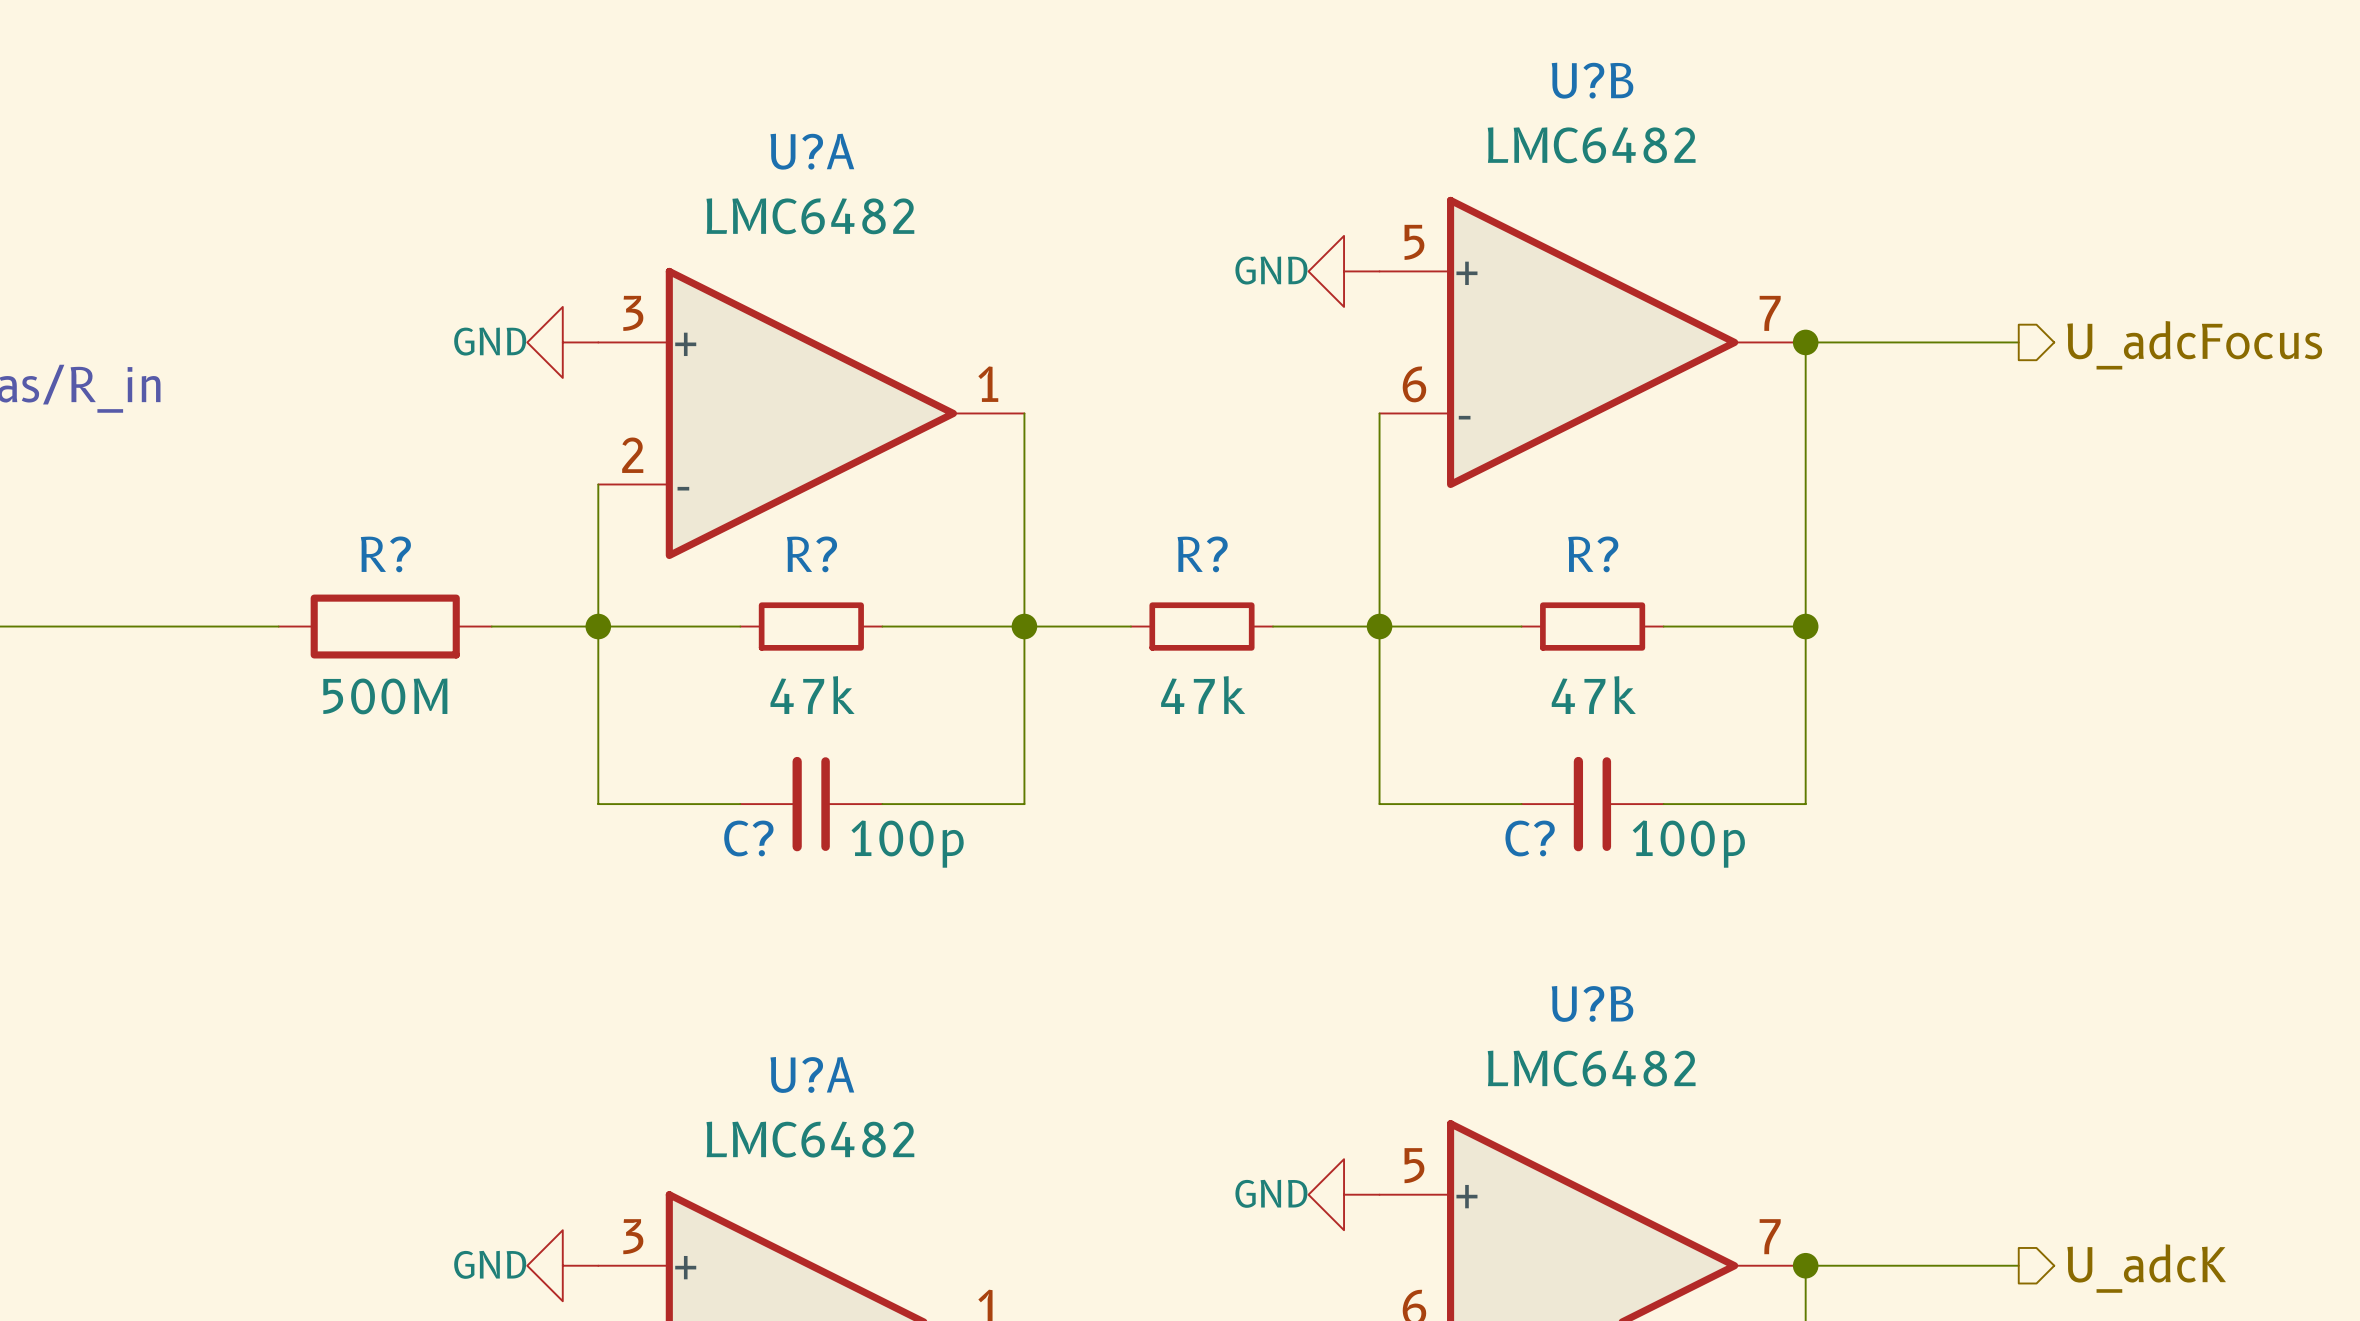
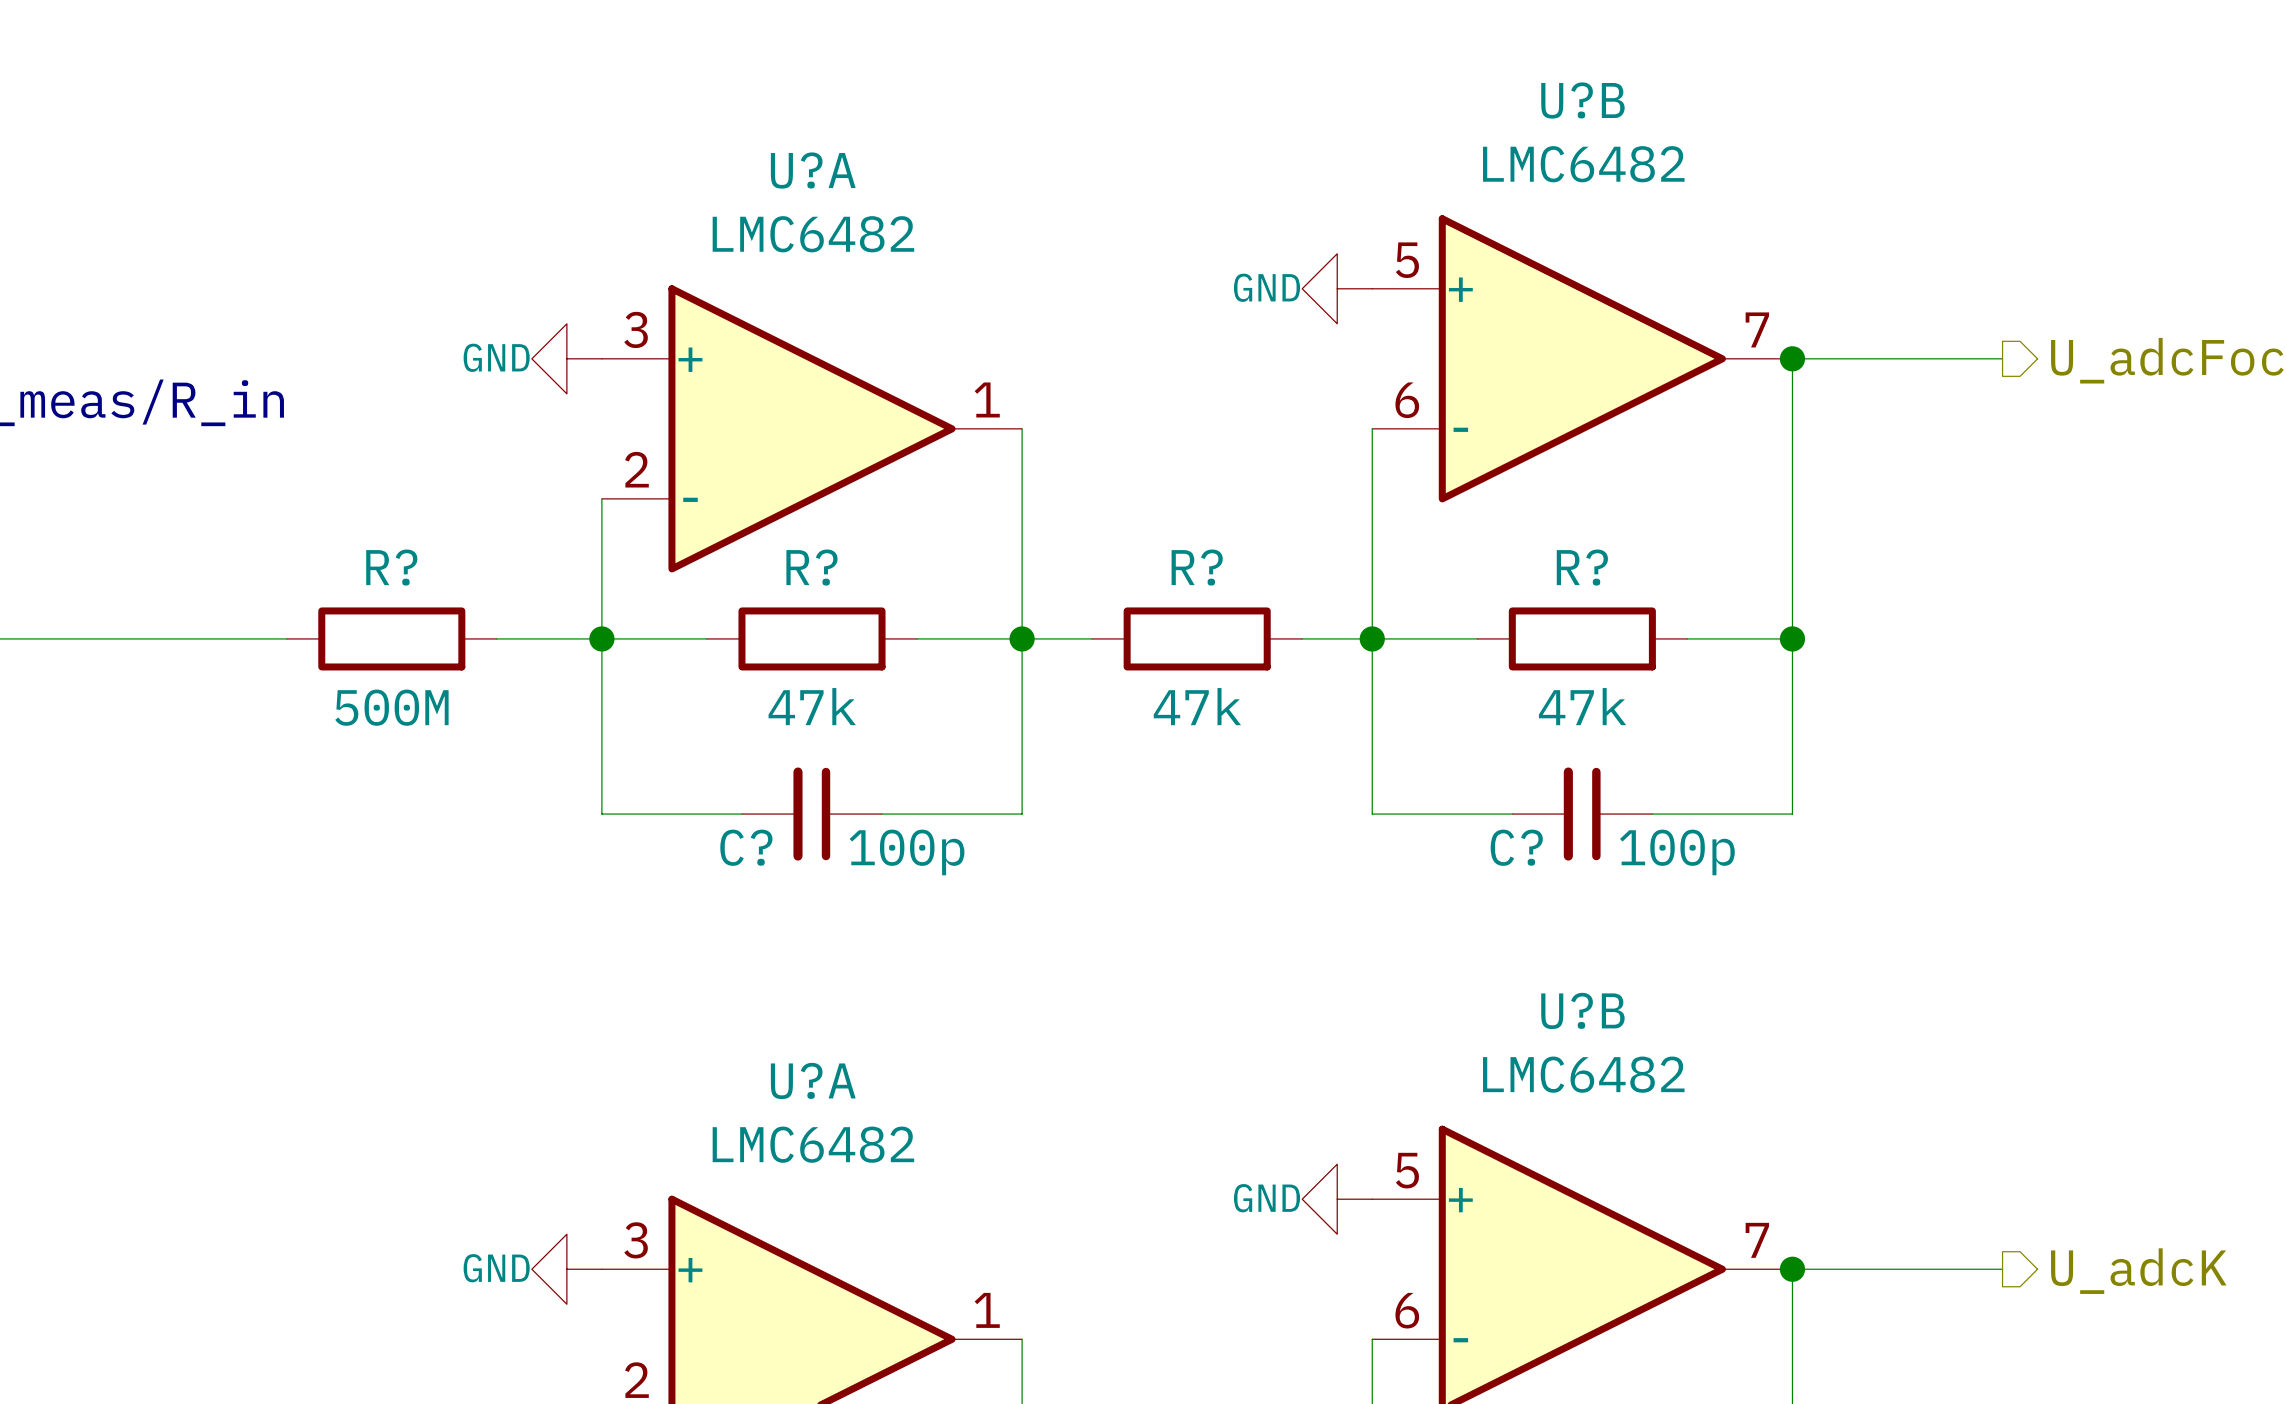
R? symbol: [740, 602, 883, 651] -> [706, 607, 918, 671]
R? symbol: [1130, 602, 1274, 651] -> [1092, 607, 1303, 671]
R? symbol: [1521, 602, 1664, 651] -> [1477, 607, 1688, 671]

